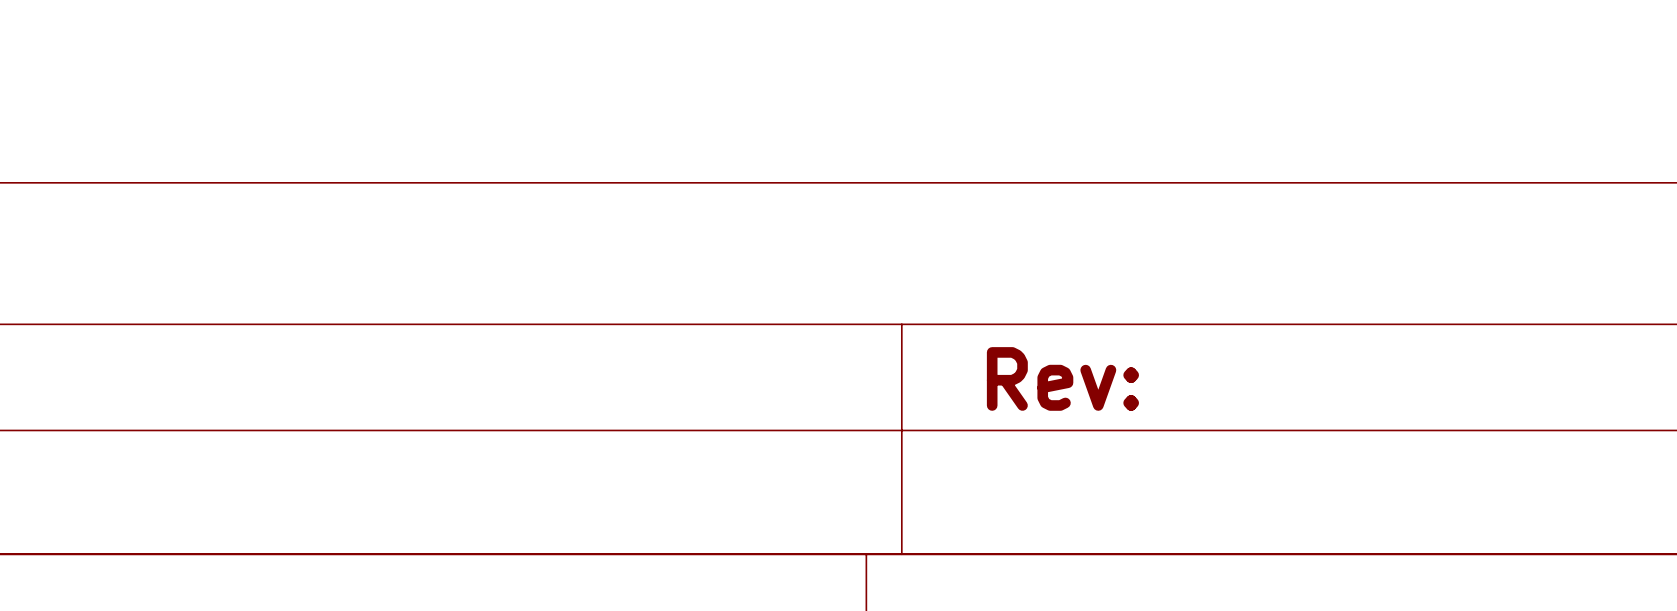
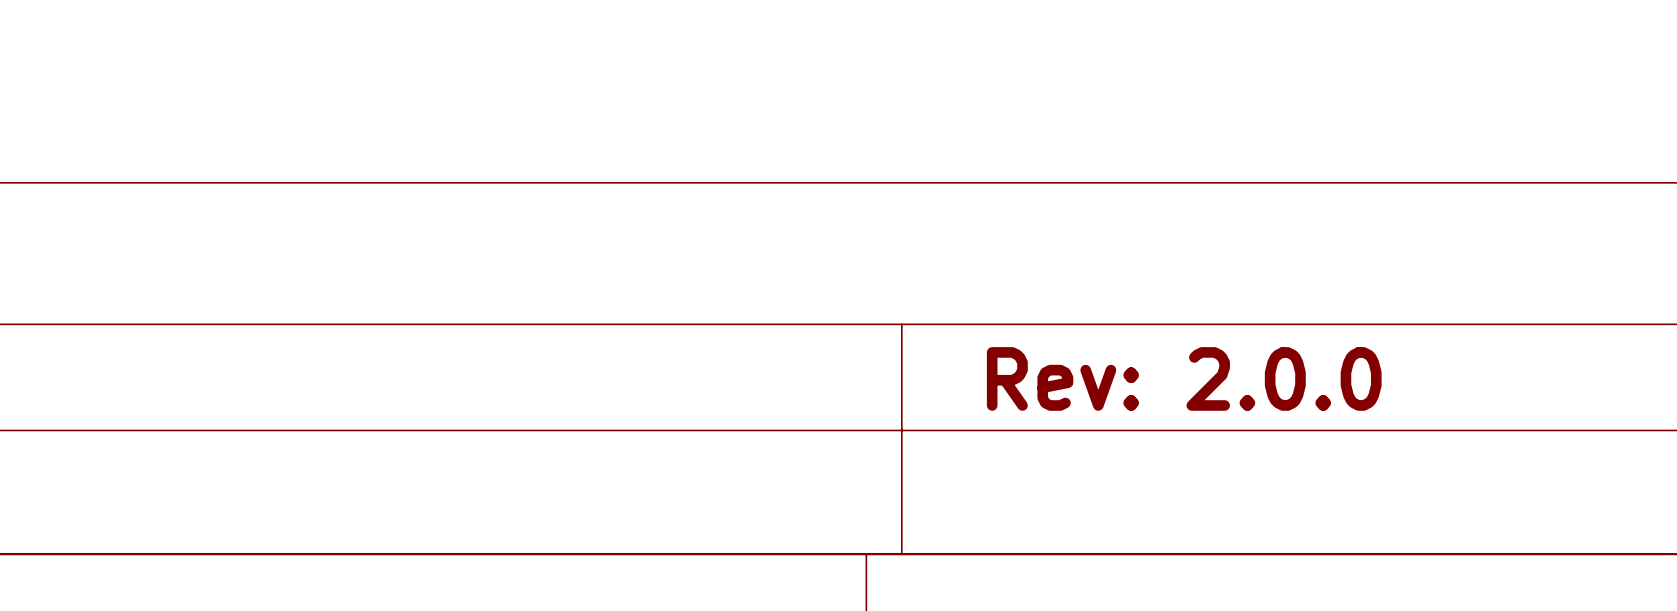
title block: Rev: (1062, 378) -> Rev: 2.0.0 (1184, 378)

